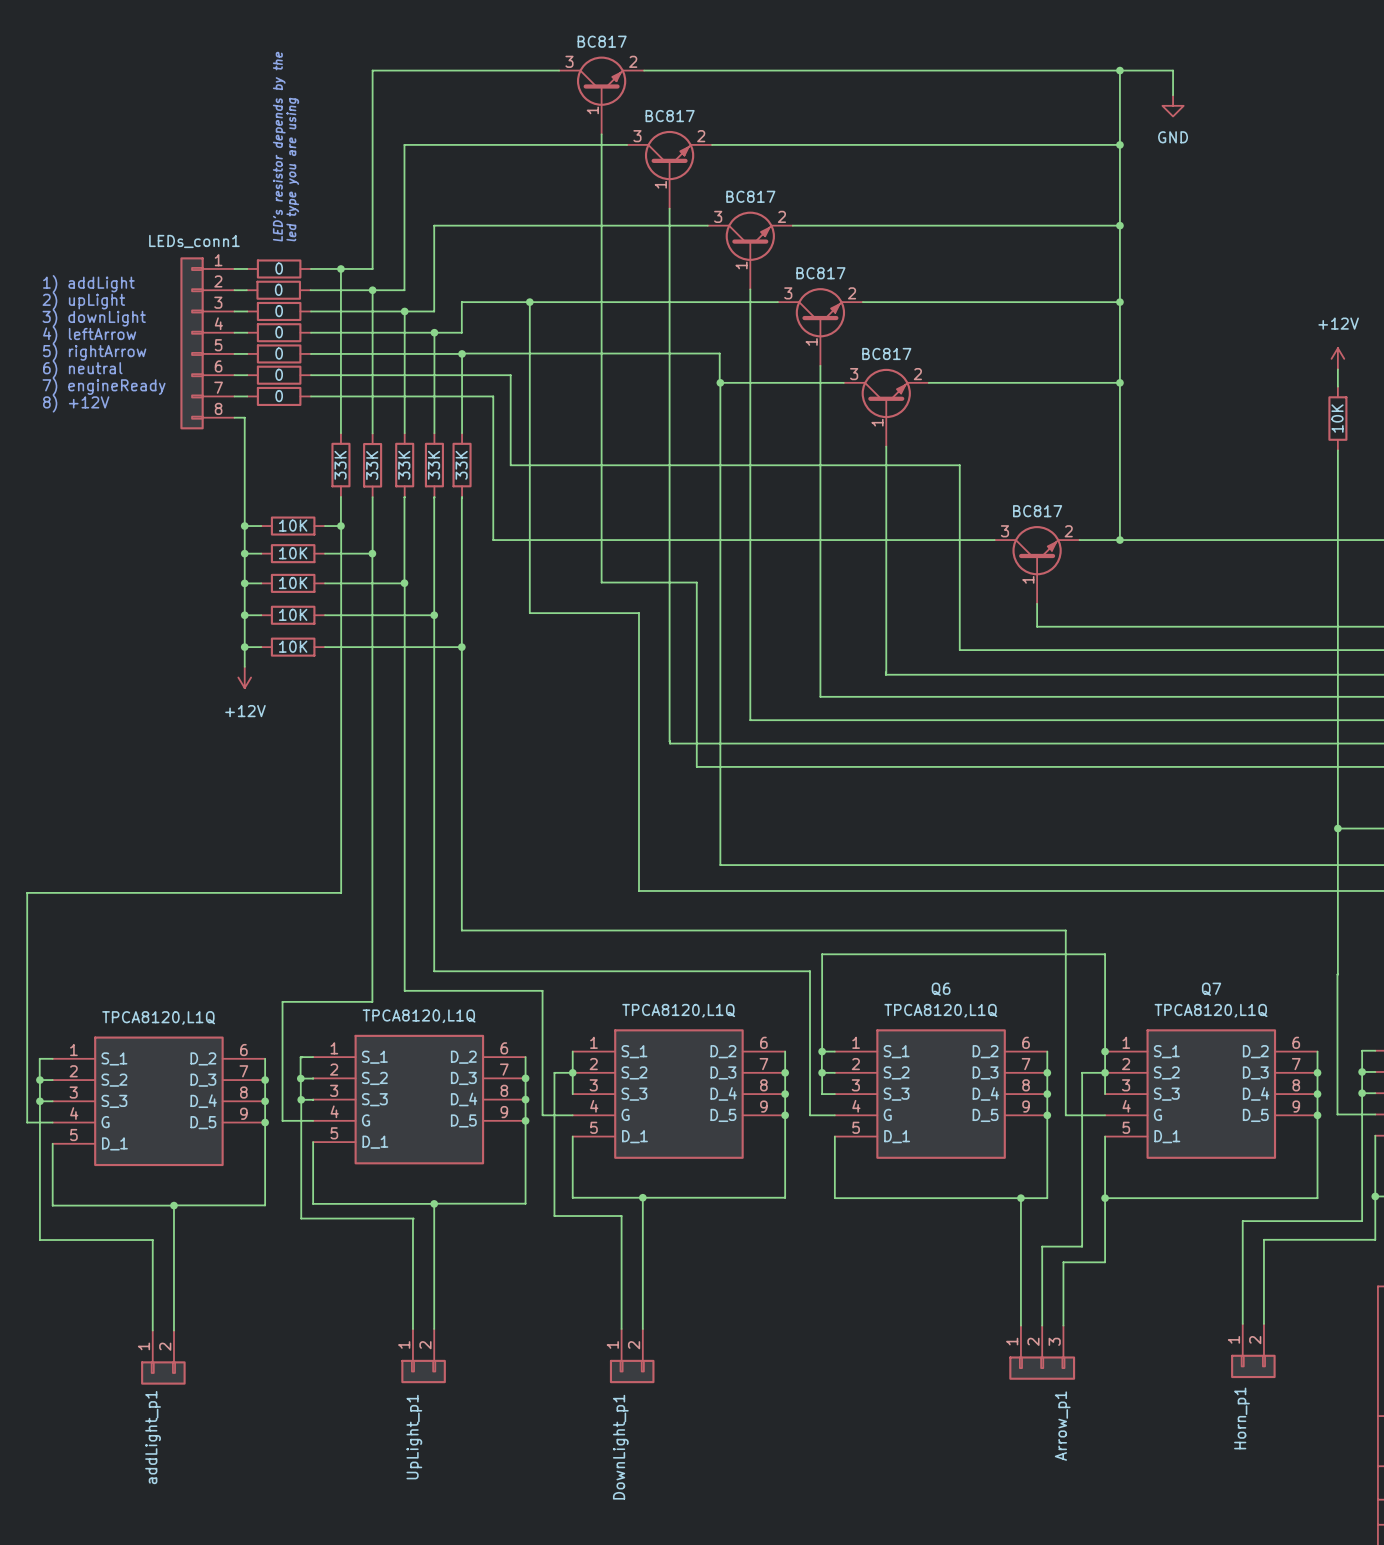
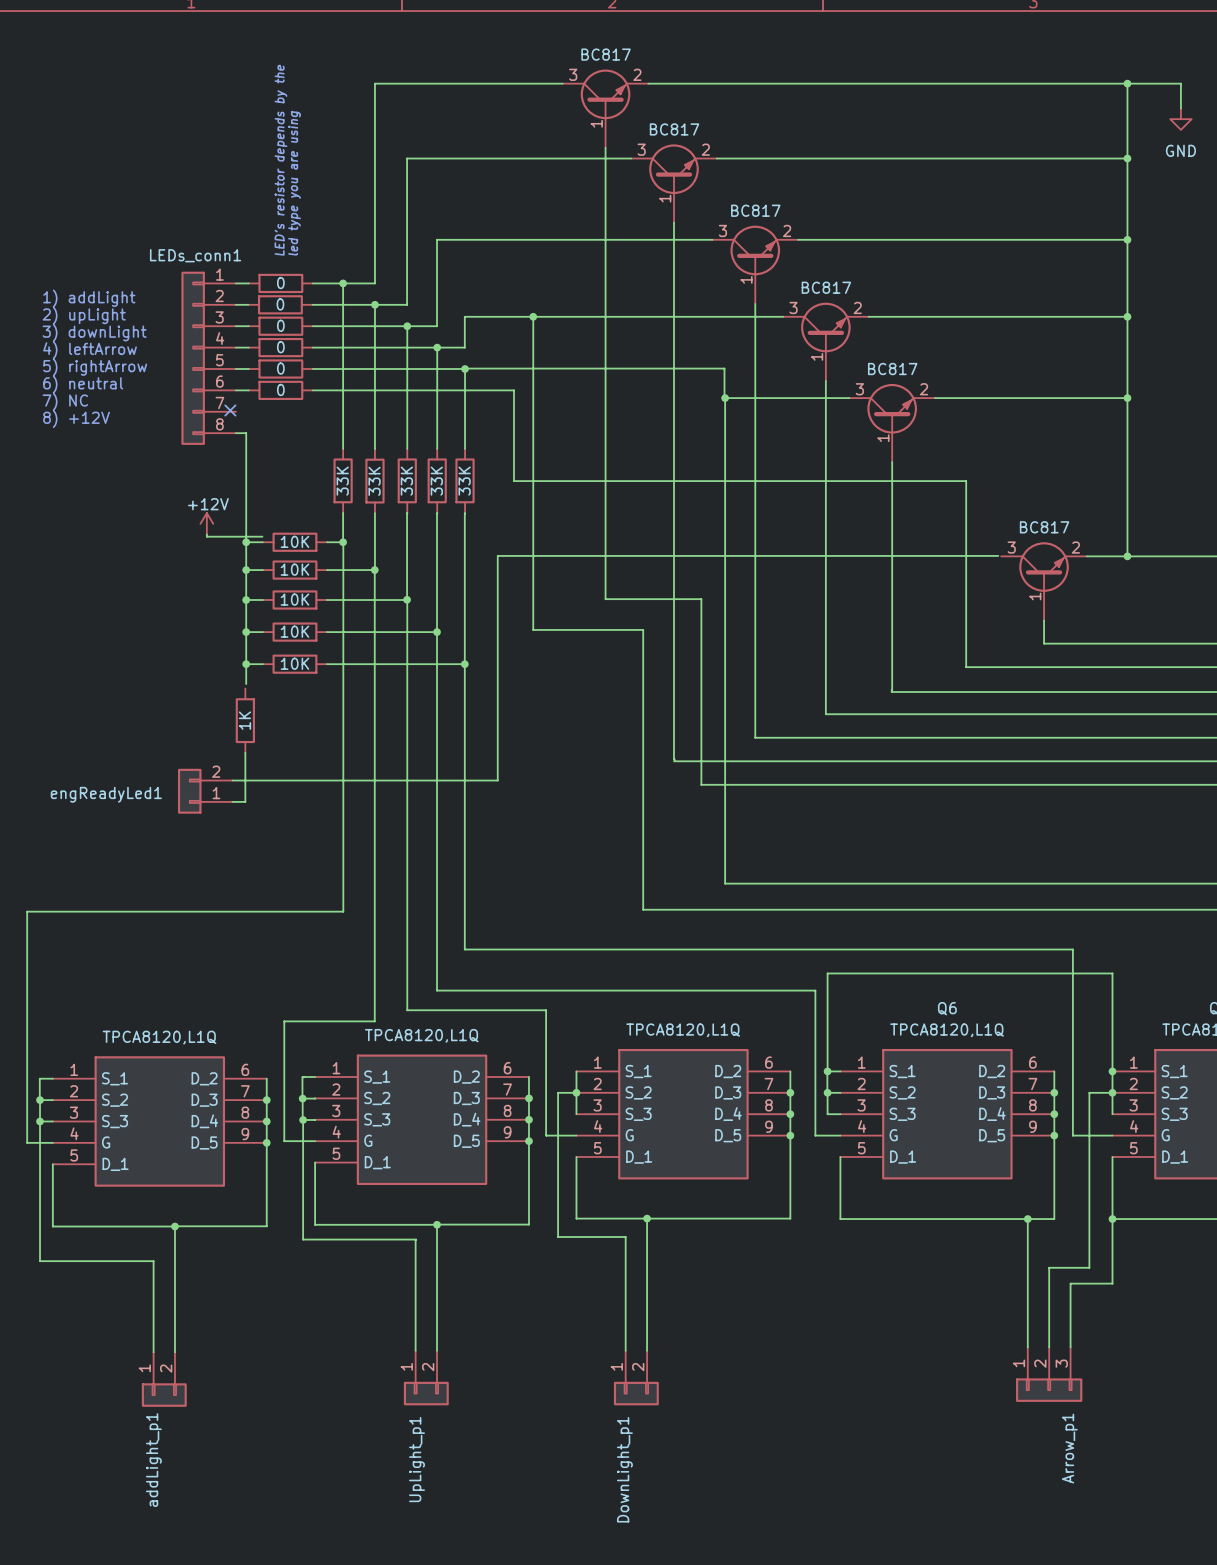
text: 7) engineReady (104, 386) -> 7) NC (65, 401)
no-connect mark: none -> (230, 410)
wire: (234, 396) (247, 396) -> none
part: 0 (279, 396) -> none
wire: (311, 396) (493, 396) (493, 540) (994, 540) -> none
wire: none -> (206, 534) (206, 536) (262, 536)
wire: none -> (998, 555) (497, 555) (497, 780) (232, 780)
power symbol rotation: 0° (244, 677) -> 180° (206, 523)
power symbol position: +12V (244, 677) -> +12V (206, 523)
part: none -> 1K (245, 720)
wire: none -> (245, 752) (245, 801) (232, 801)
engReadyLed1: none -> (205, 791)

